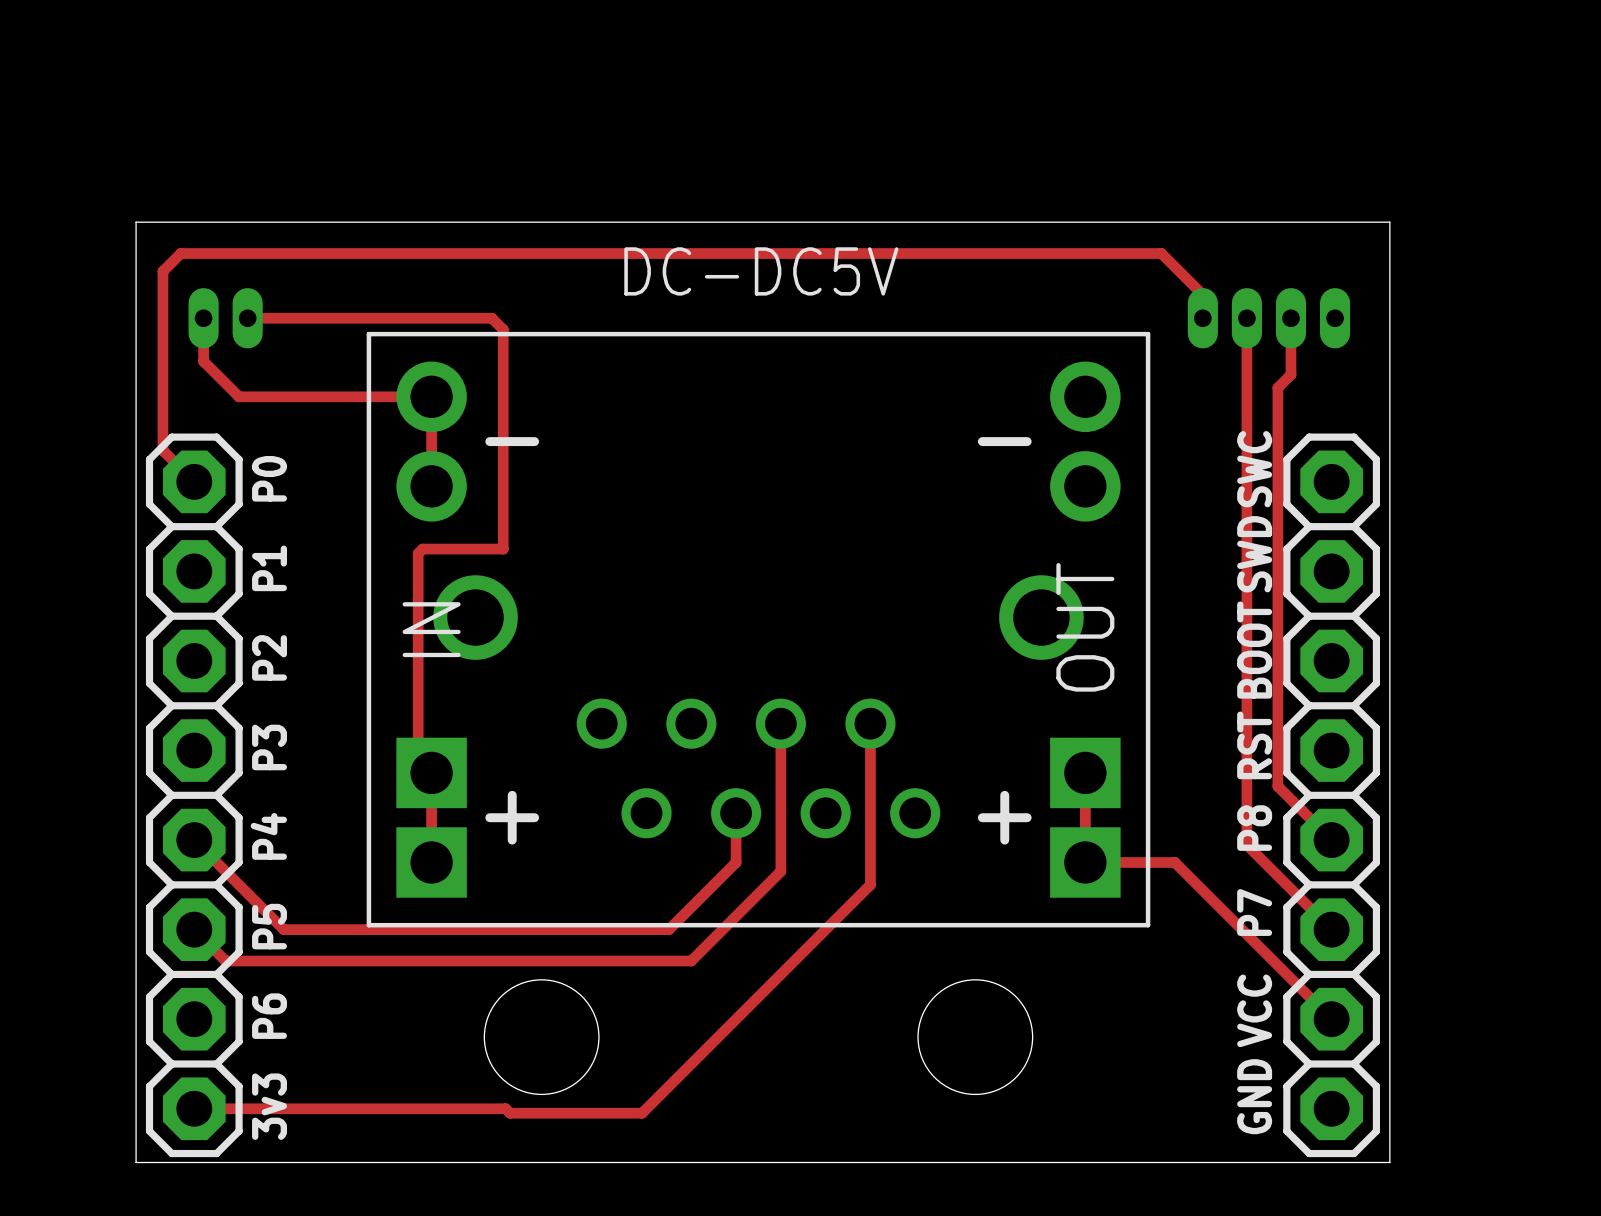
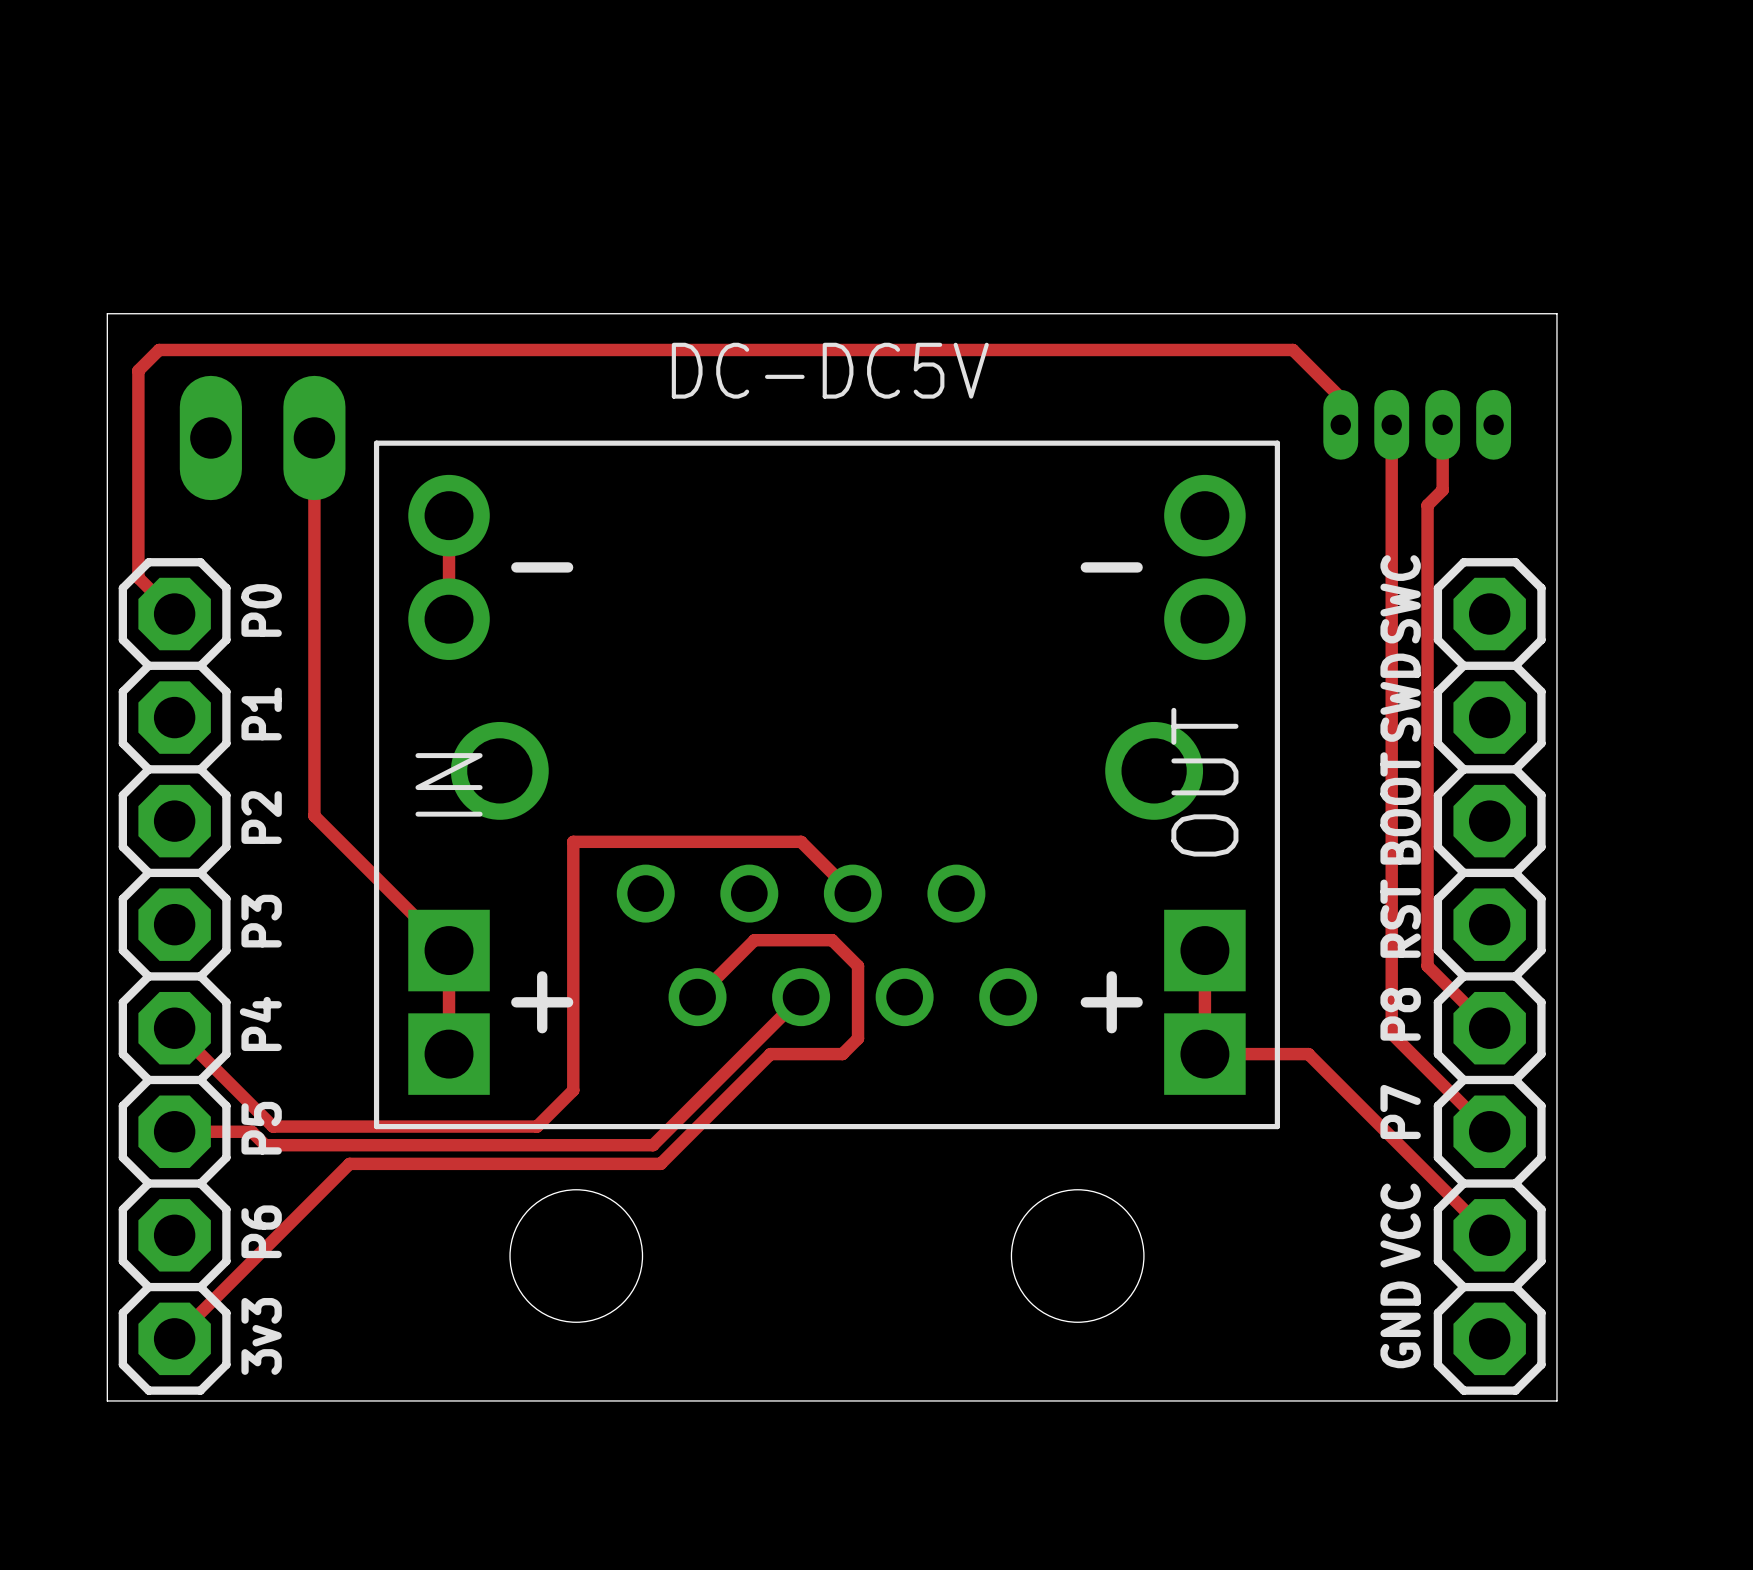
track: (203, 318) (203, 361) (239, 396) (431, 396) -> none
part: (225, 318) -> none
track: (247, 318) (491, 318) (503, 329) (503, 549) (422, 549) (418, 553) (418, 759) -> (314, 437) (314, 815) (433, 935)
part: none -> (262, 437)
track: (780, 723) (780, 871) (691, 961) (225, 961) (194, 929) -> (852, 893) (801, 841) (573, 841) (573, 1090) (537, 1126) (273, 1126)
track: (870, 723) (870, 884) (642, 1113) (510, 1113) (505, 1108) (194, 1108) -> (697, 997) (754, 940) (832, 940) (858, 966) (858, 1038) (842, 1054) (770, 1054) (660, 1163) (349, 1163) (174, 1338)
track: (736, 813) (736, 862) (668, 929) (283, 929) (279, 925) -> (801, 997) (653, 1145) (265, 1145) (251, 1131) (174, 1131)

